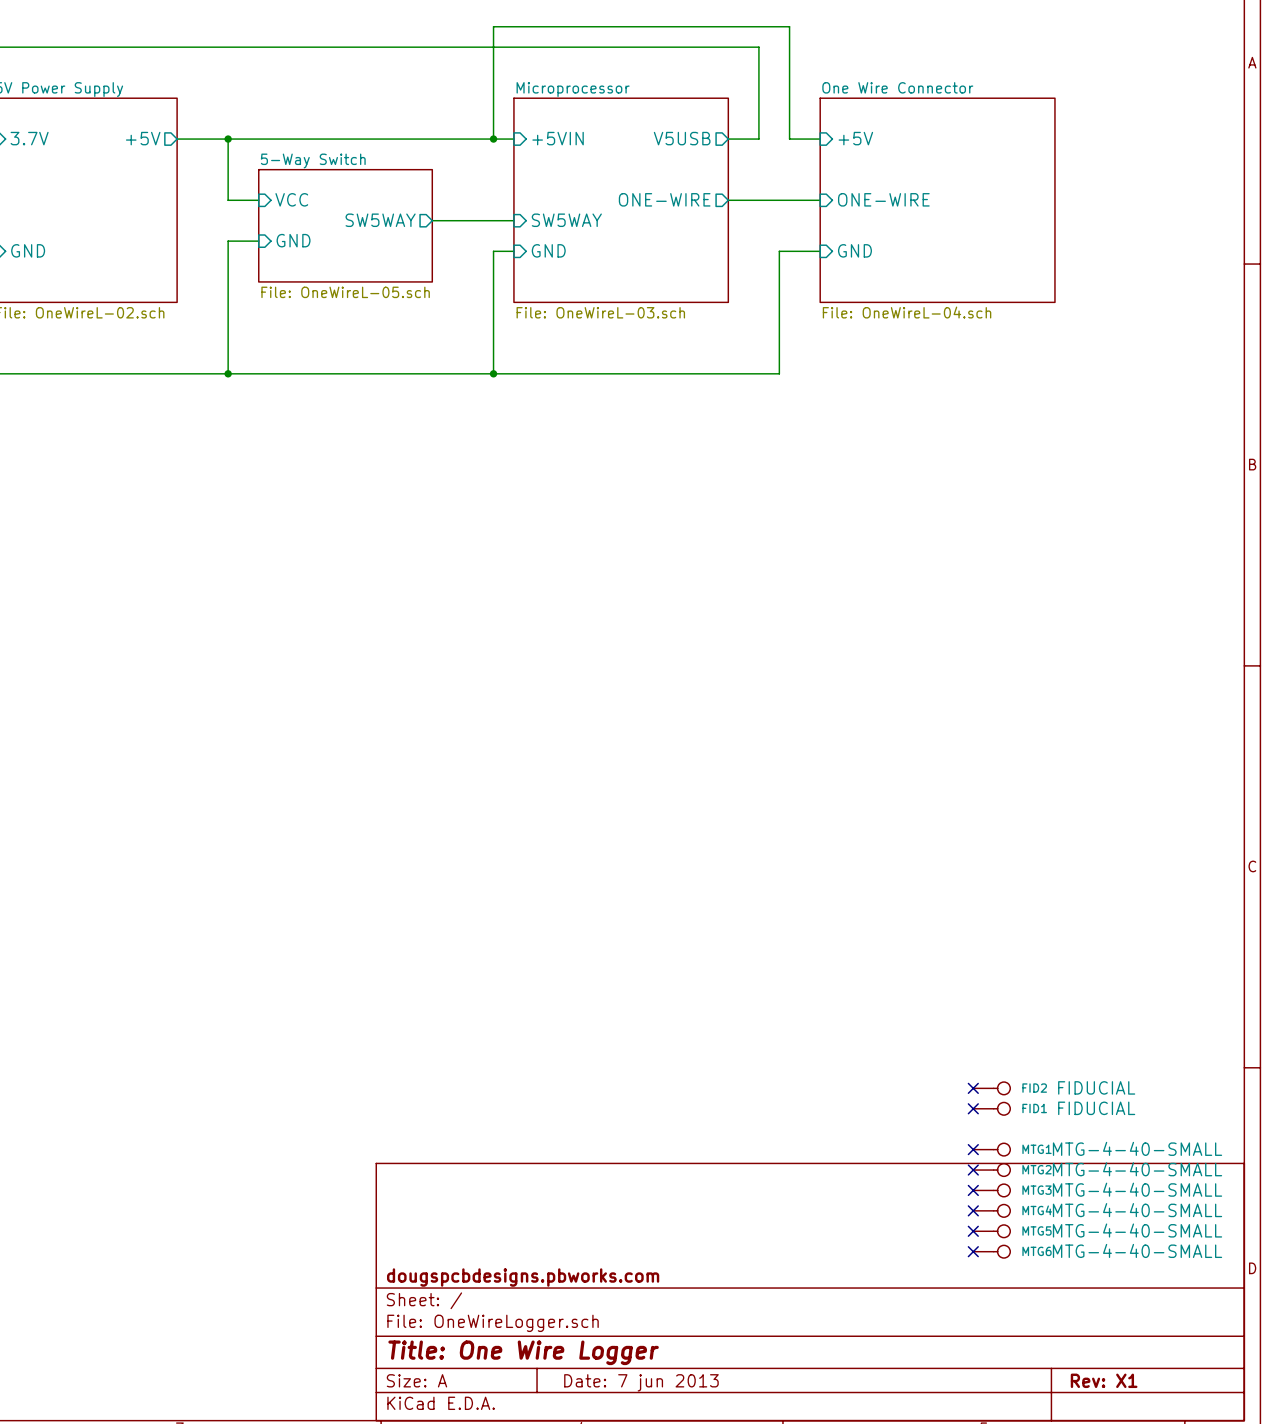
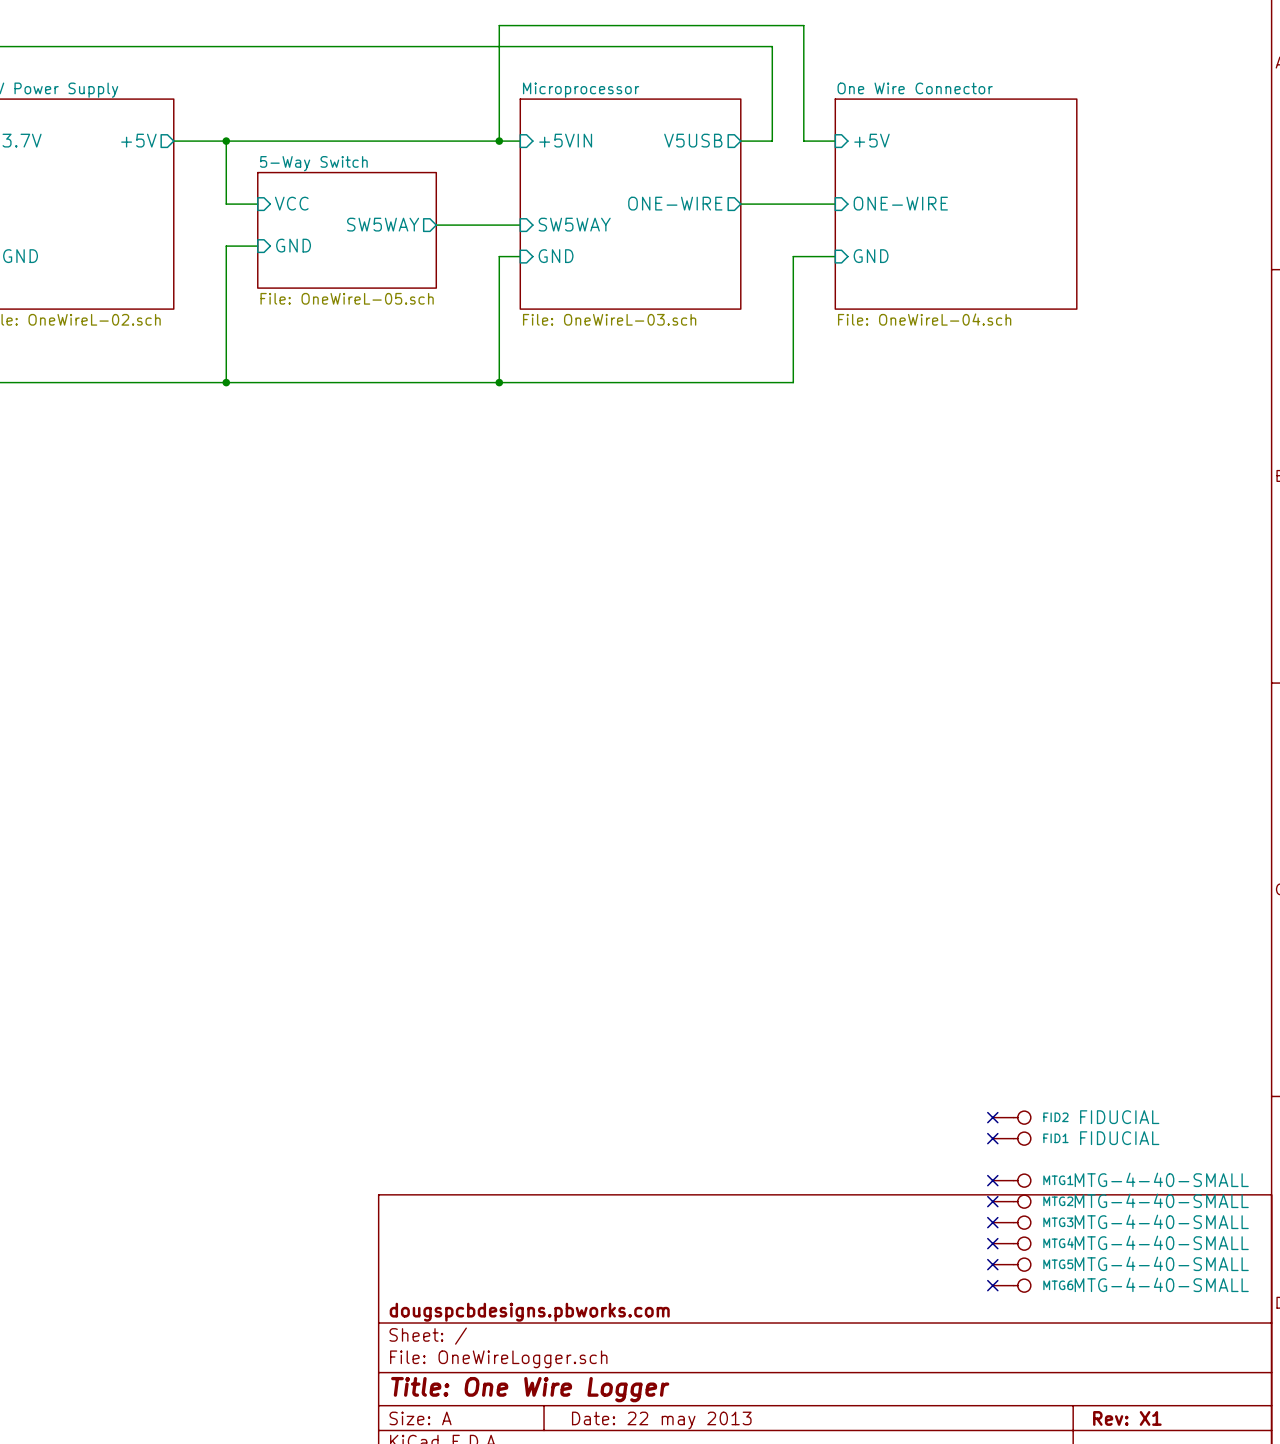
title block: Date: 7 jun 2013 (641, 1382) -> Date: 22 may 2013 (661, 1420)

